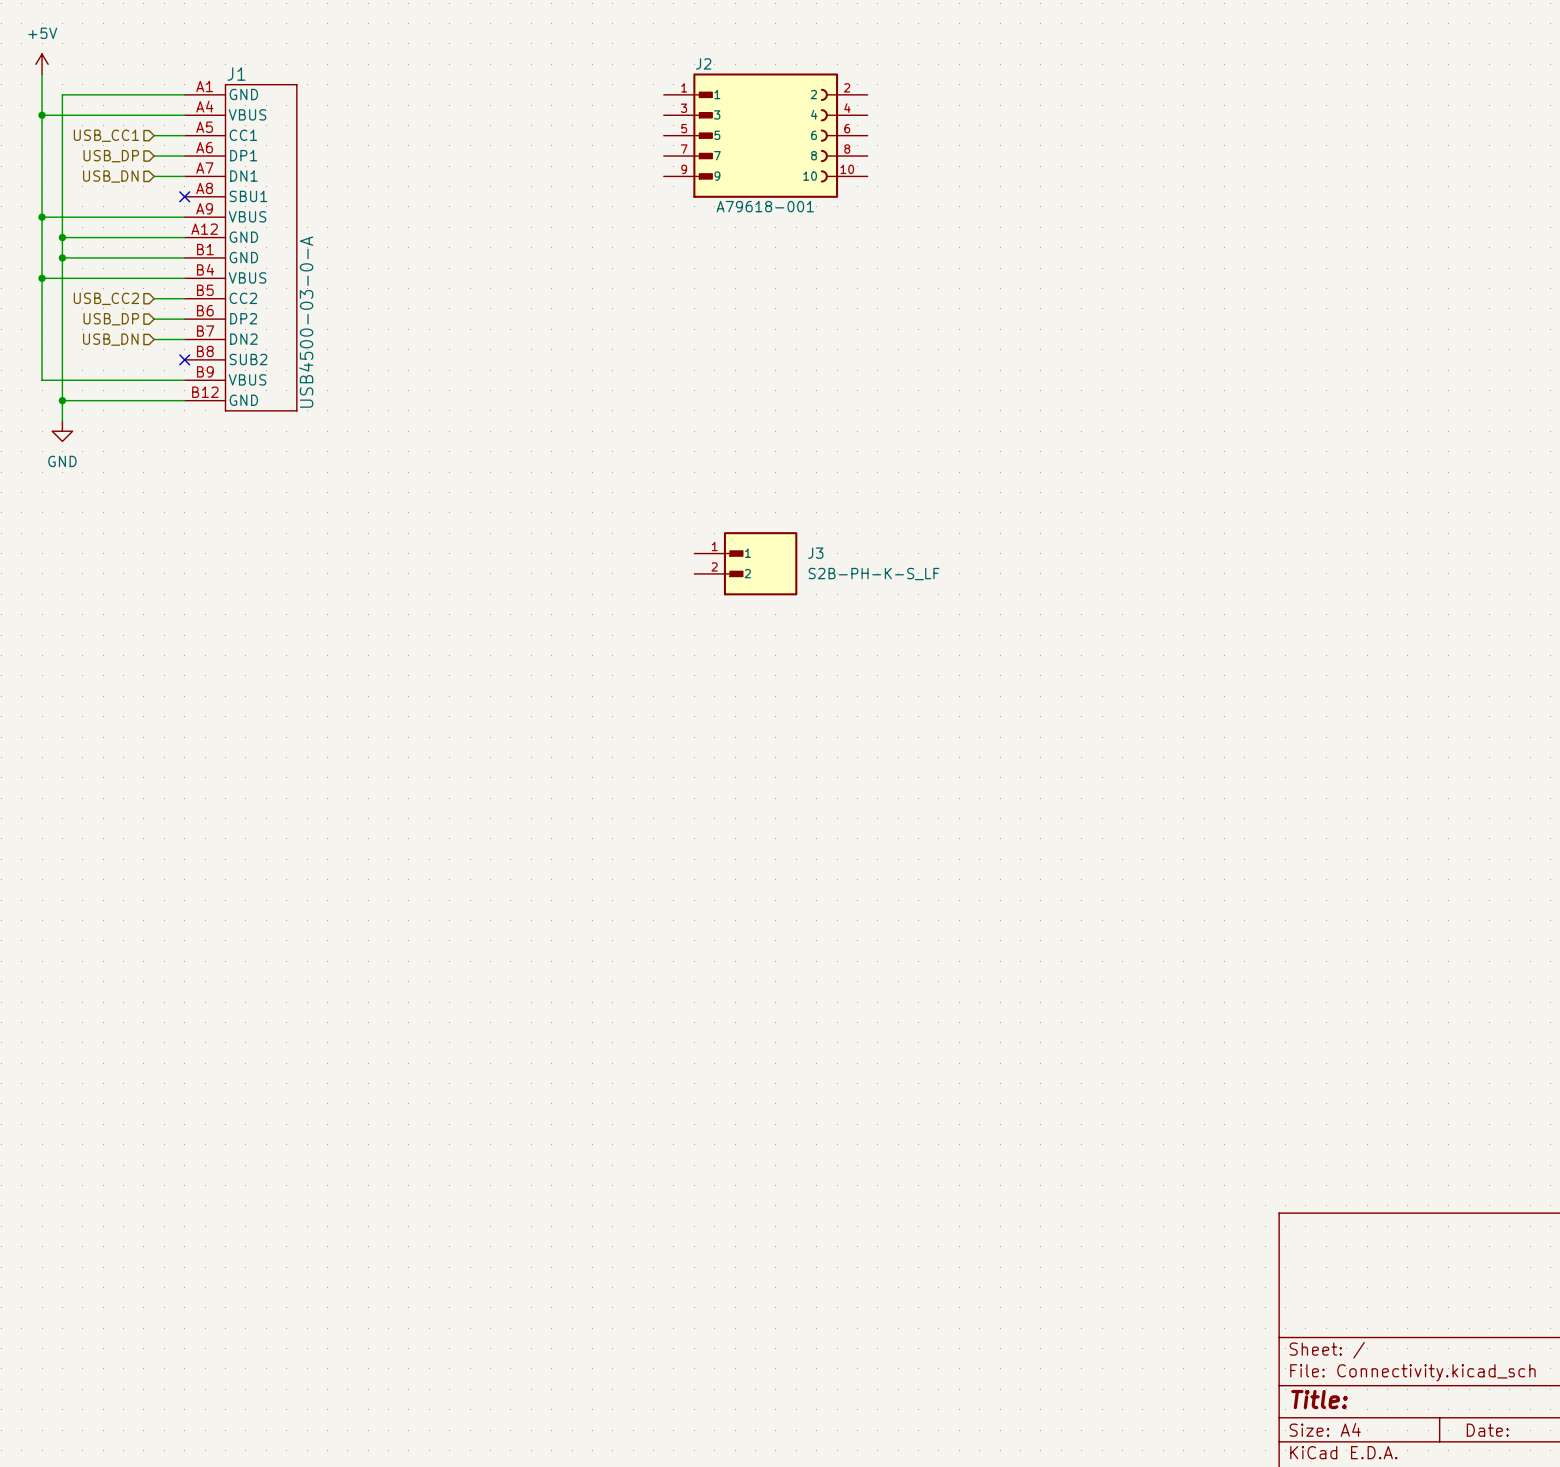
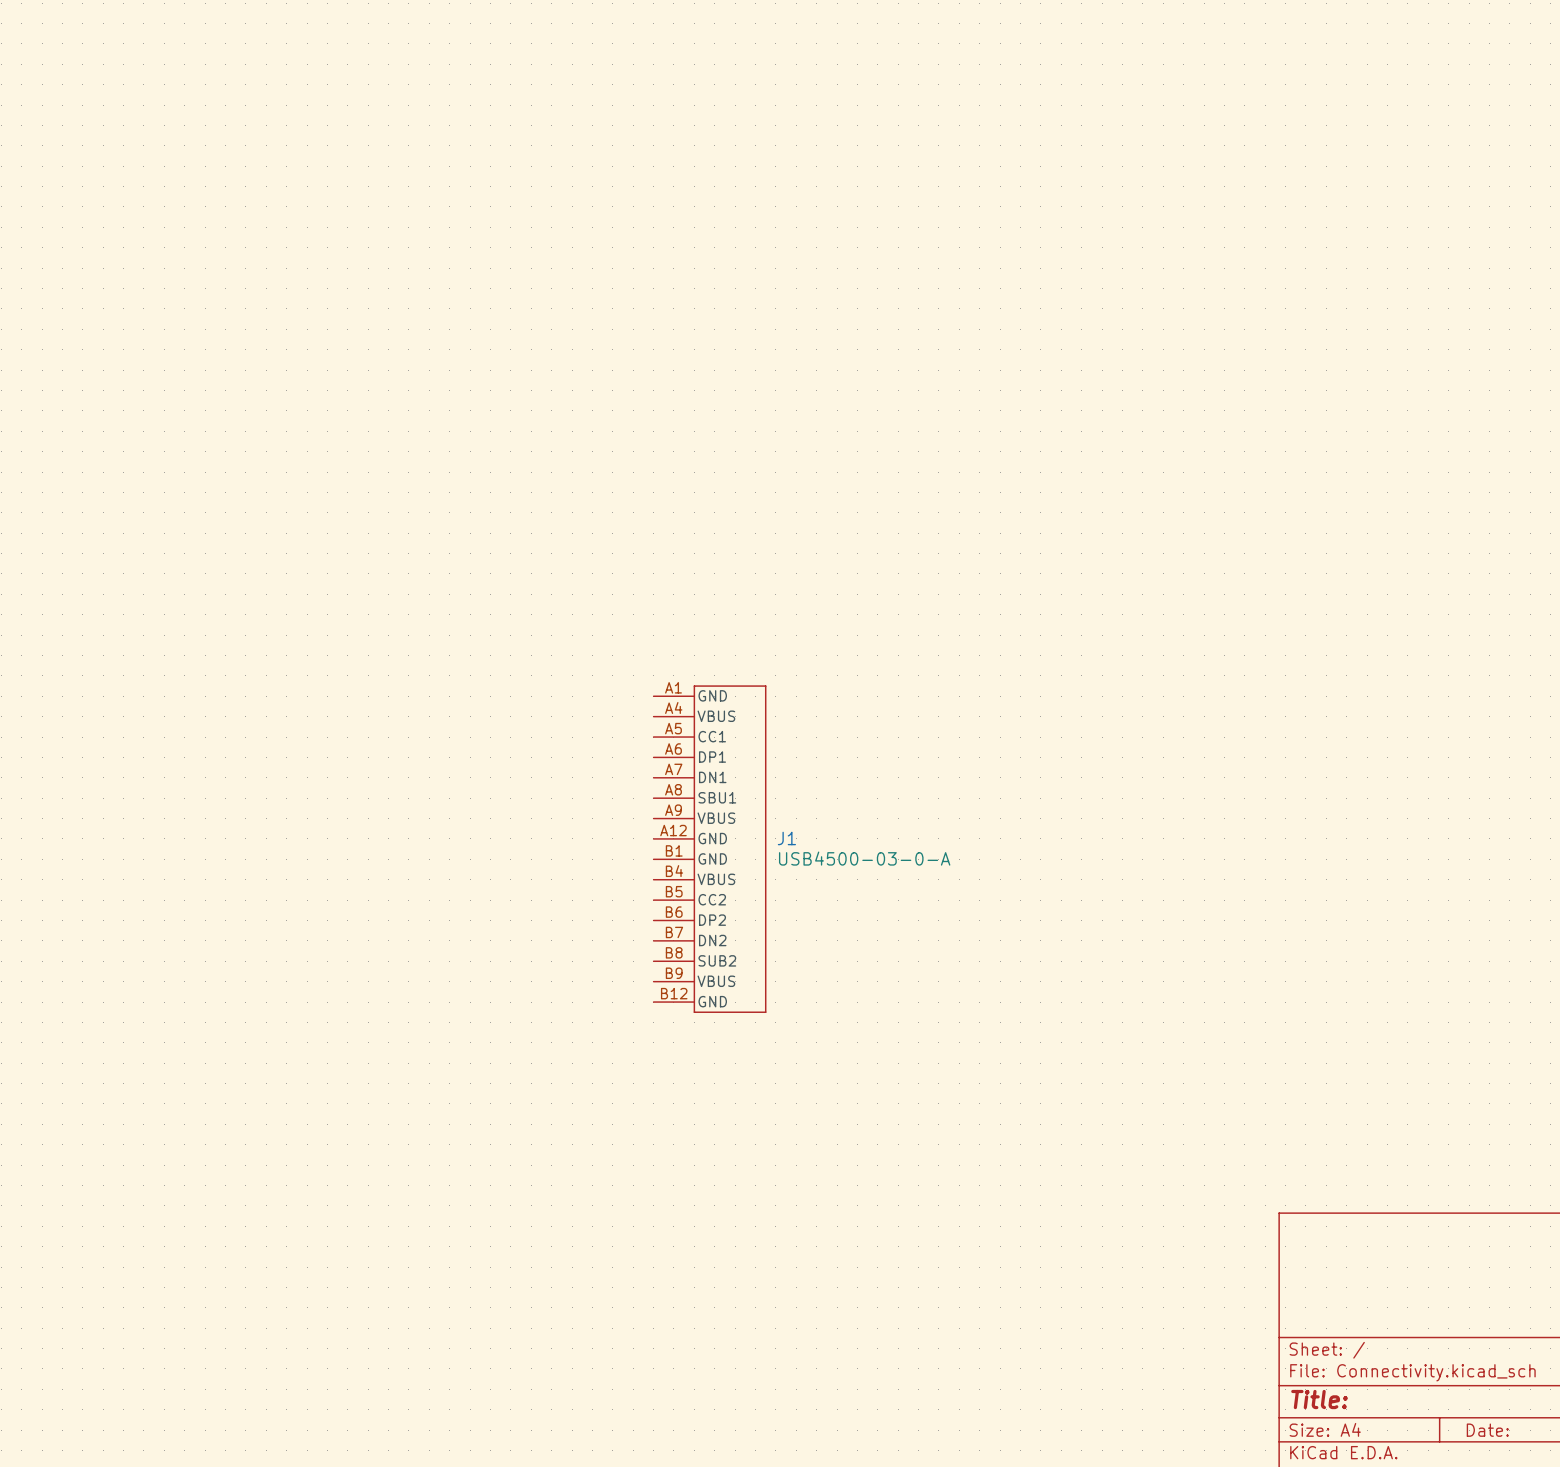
power symbol: +5V (42, 64) -> none
wire: (42, 74) (42, 380) (184, 380) -> none
J1 name position: J1 (236, 74) -> J1 (786, 838)
wire: (184, 94) (62, 94) (62, 421) -> none
wire: (42, 115) (184, 115) -> none
junction: (42, 115) -> none
hierarchical label: USB_CC1 (106, 135) -> none
wire: (154, 135) (184, 135) -> none
J2: A79618-001 (765, 135) -> none
hierarchical label: USB_DP (111, 156) -> none
wire: (154, 156) (184, 156) -> none
hierarchical label: USB_DN (110, 176) -> none
wire: (154, 176) (184, 176) -> none
no-connect mark: (184, 196) -> none
wire: (42, 217) (184, 217) -> none
junction: (42, 217) -> none
wire: (62, 237) (184, 237) -> none
junction: (62, 237) -> none
J1 position: (241, 247) -> (709, 849)
wire: (62, 257) (184, 257) -> none
junction: (62, 257) -> none
wire: (42, 278) (184, 278) -> none
junction: (42, 278) -> none
hierarchical label: USB_CC2 (106, 298) -> none
wire: (154, 298) (184, 298) -> none
hierarchical label: USB_DP (111, 319) -> none
wire: (154, 319) (184, 319) -> none
J1 value rotation: 0° (306, 322) -> 90° clockwise (864, 858)
hierarchical label: USB_DN (110, 339) -> none
wire: (154, 339) (184, 339) -> none
no-connect mark: (184, 359) -> none
wire: (62, 400) (184, 400) -> none
junction: (62, 400) -> none
power symbol: GND (62, 431) -> none
J3: S2B-PH-K-S_LF (745, 563) -> none

